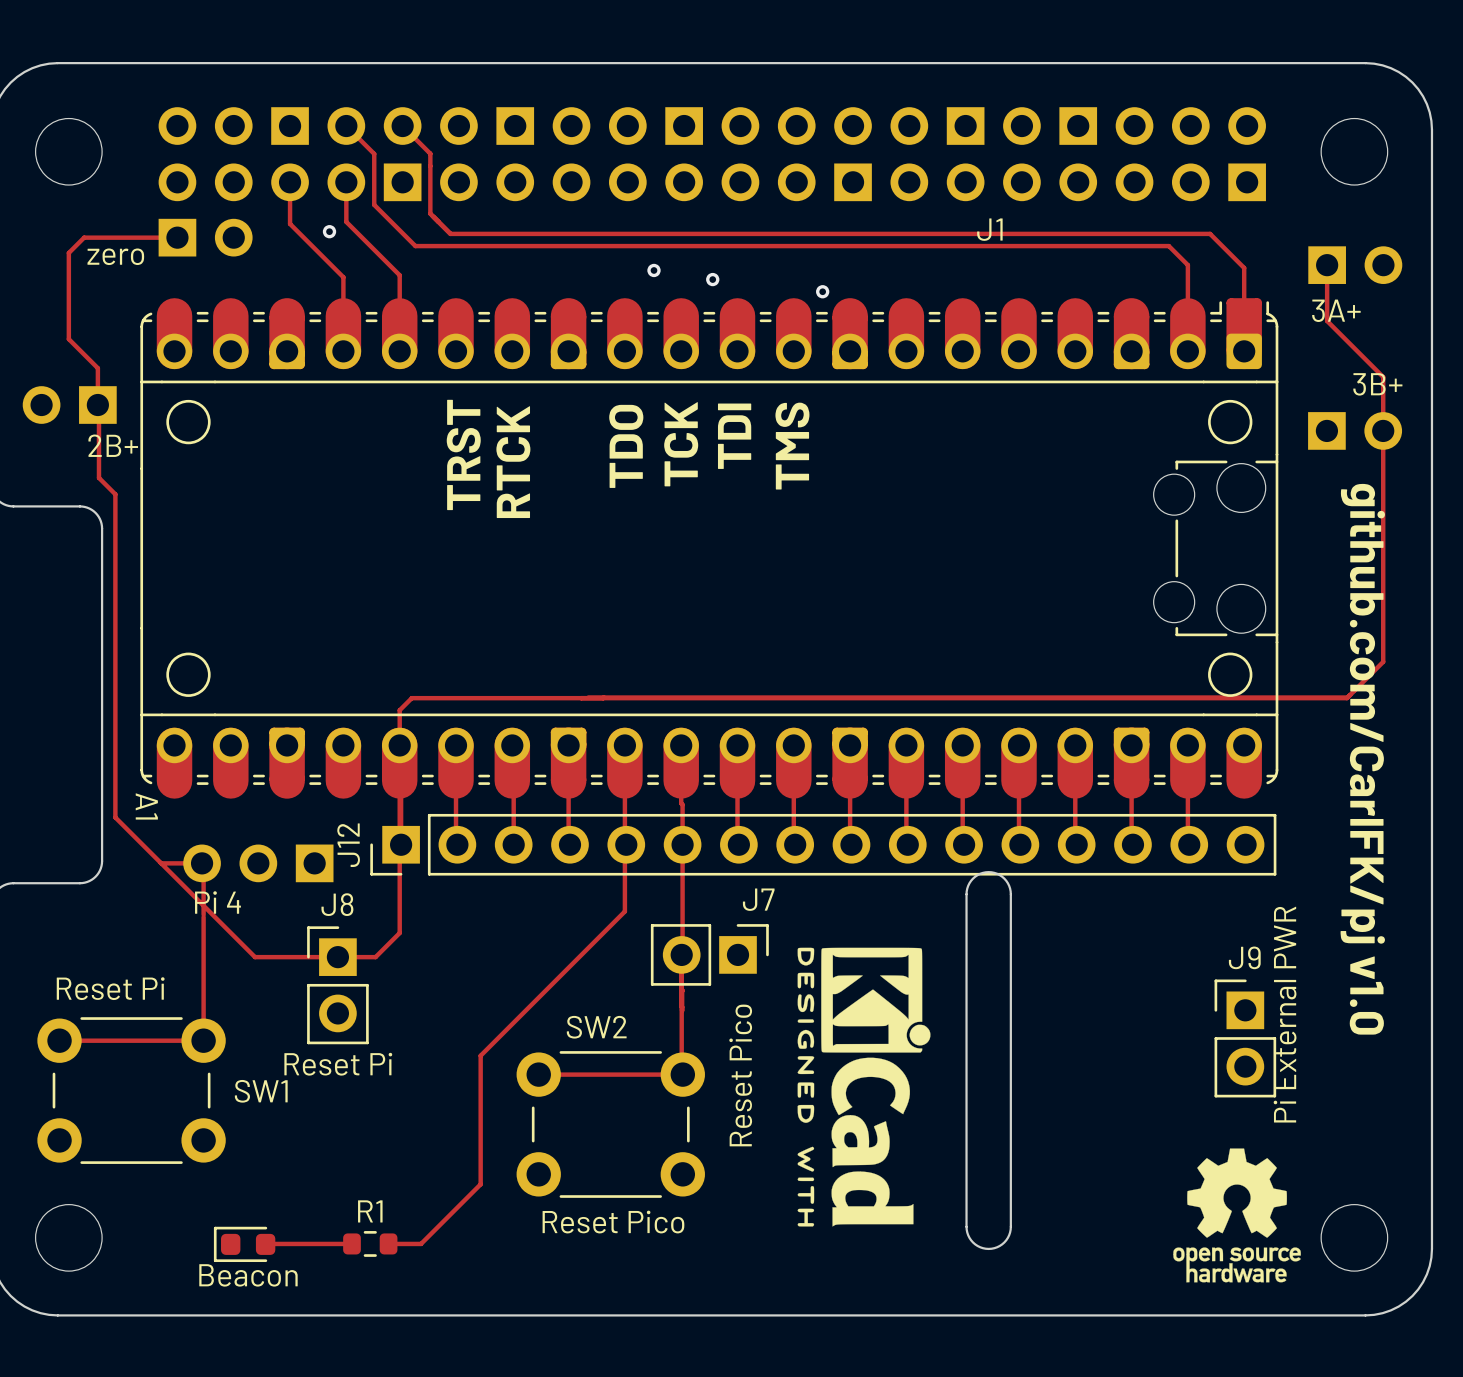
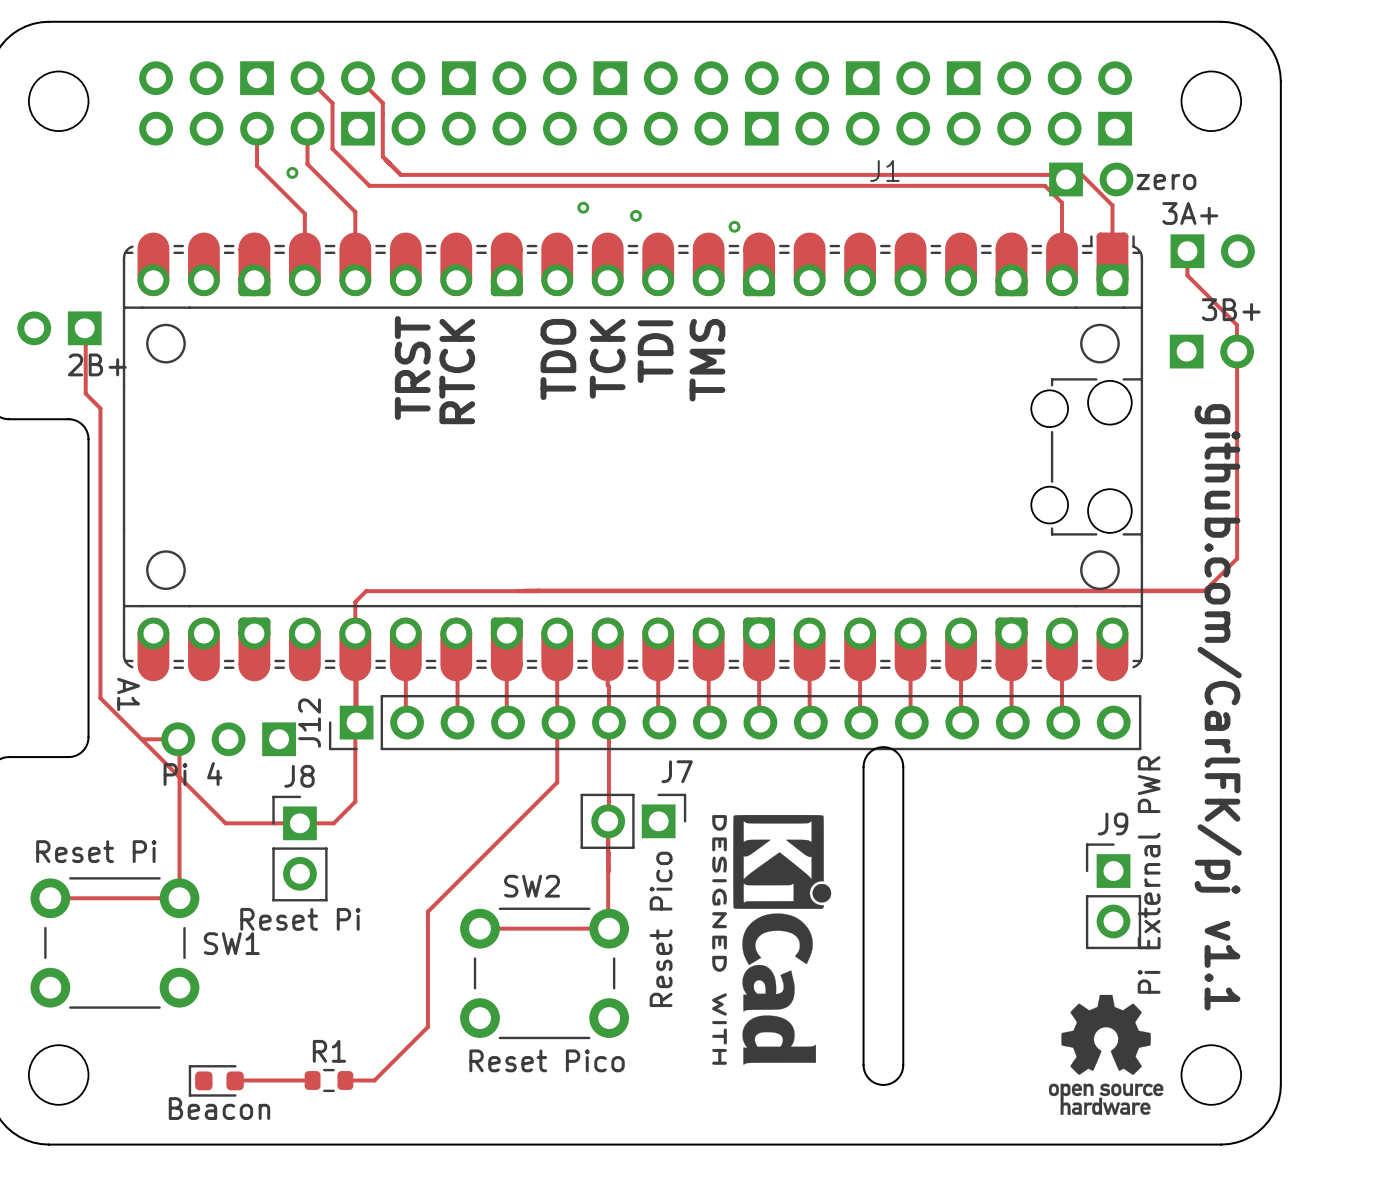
track: (177, 237) (84, 237) (68, 252) (68, 339) (97, 368) (97, 405) -> none
part: zero (205, 237) -> none
part: none -> zero (1091, 179)
track: (1327, 265) (1327, 321) (1383, 377) (1383, 430) -> (1187, 251) (1187, 275) (1236, 324) (1236, 351)
part position: (1355, 265) -> (1212, 251)
part value position: 3A+ (1336, 310) -> 3A+ (1190, 213)
text: github.com/CarlFK/pj v1.0 (1362, 759) -> github.com/CarlFK/pj v1.1 (1218, 707)

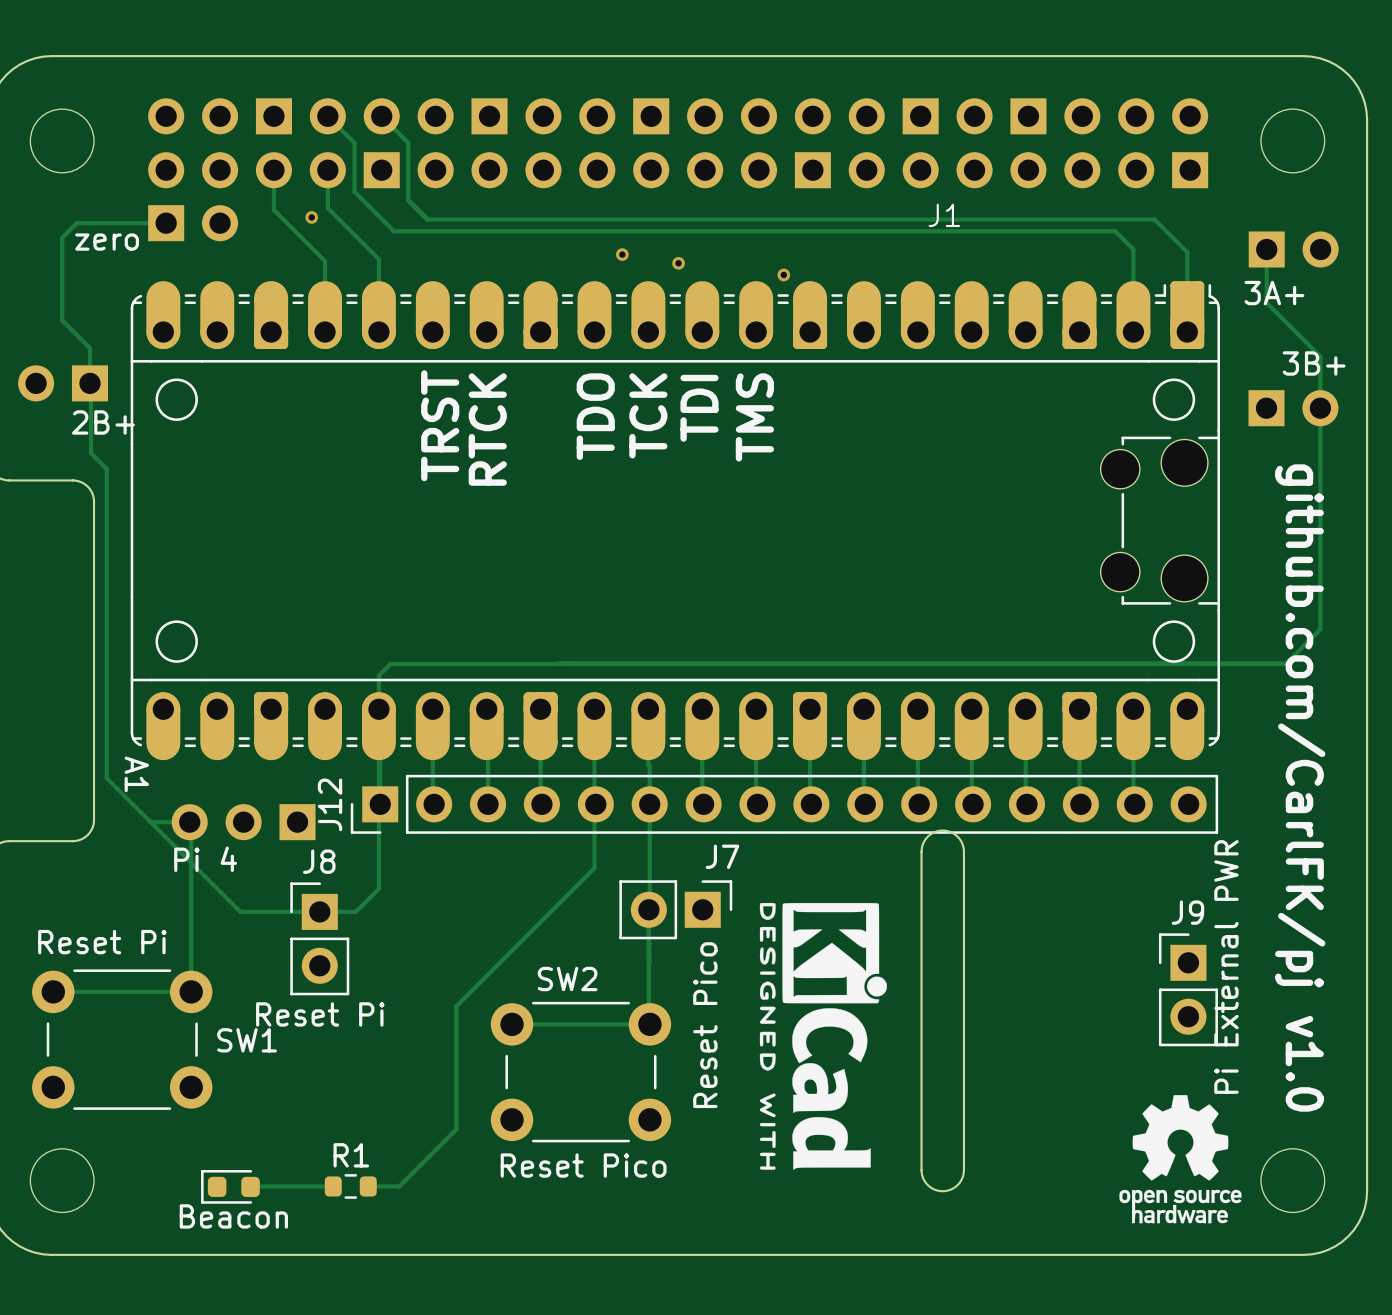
track: none -> (166, 223) (76, 223) (62, 237) (62, 320) (89, 348) (89, 383)
part: none -> zero (193, 223)
part: zero (1091, 179) -> none
part value position: 3A+ (1190, 213) -> 3A+ (1274, 293)
track: (1187, 251) (1187, 275) (1236, 324) (1236, 351) -> (1266, 249) (1266, 302) (1320, 356) (1320, 408)
part position: (1212, 251) -> (1293, 249)
text: github.com/CarlFK/pj v1.1 (1218, 707) -> github.com/CarlFK/pj v1.0 (1300, 788)

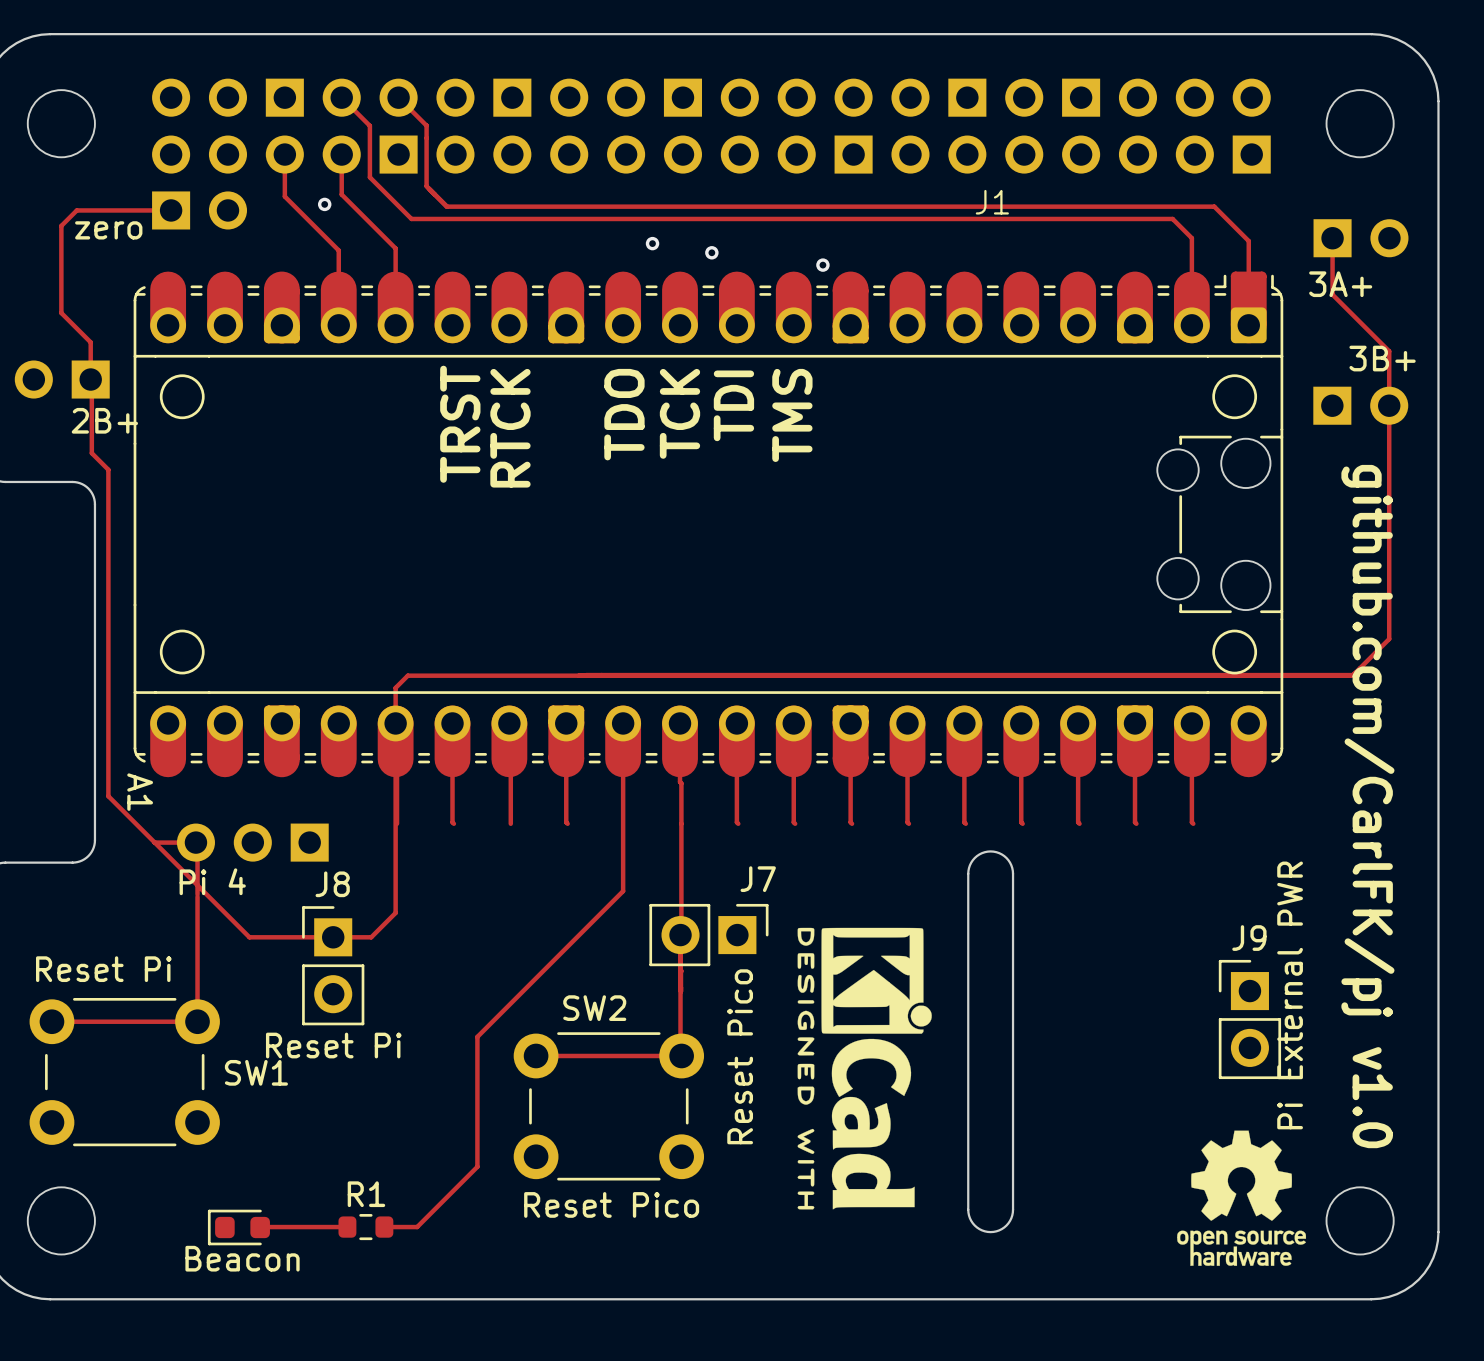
J12: (784, 804) -> none

